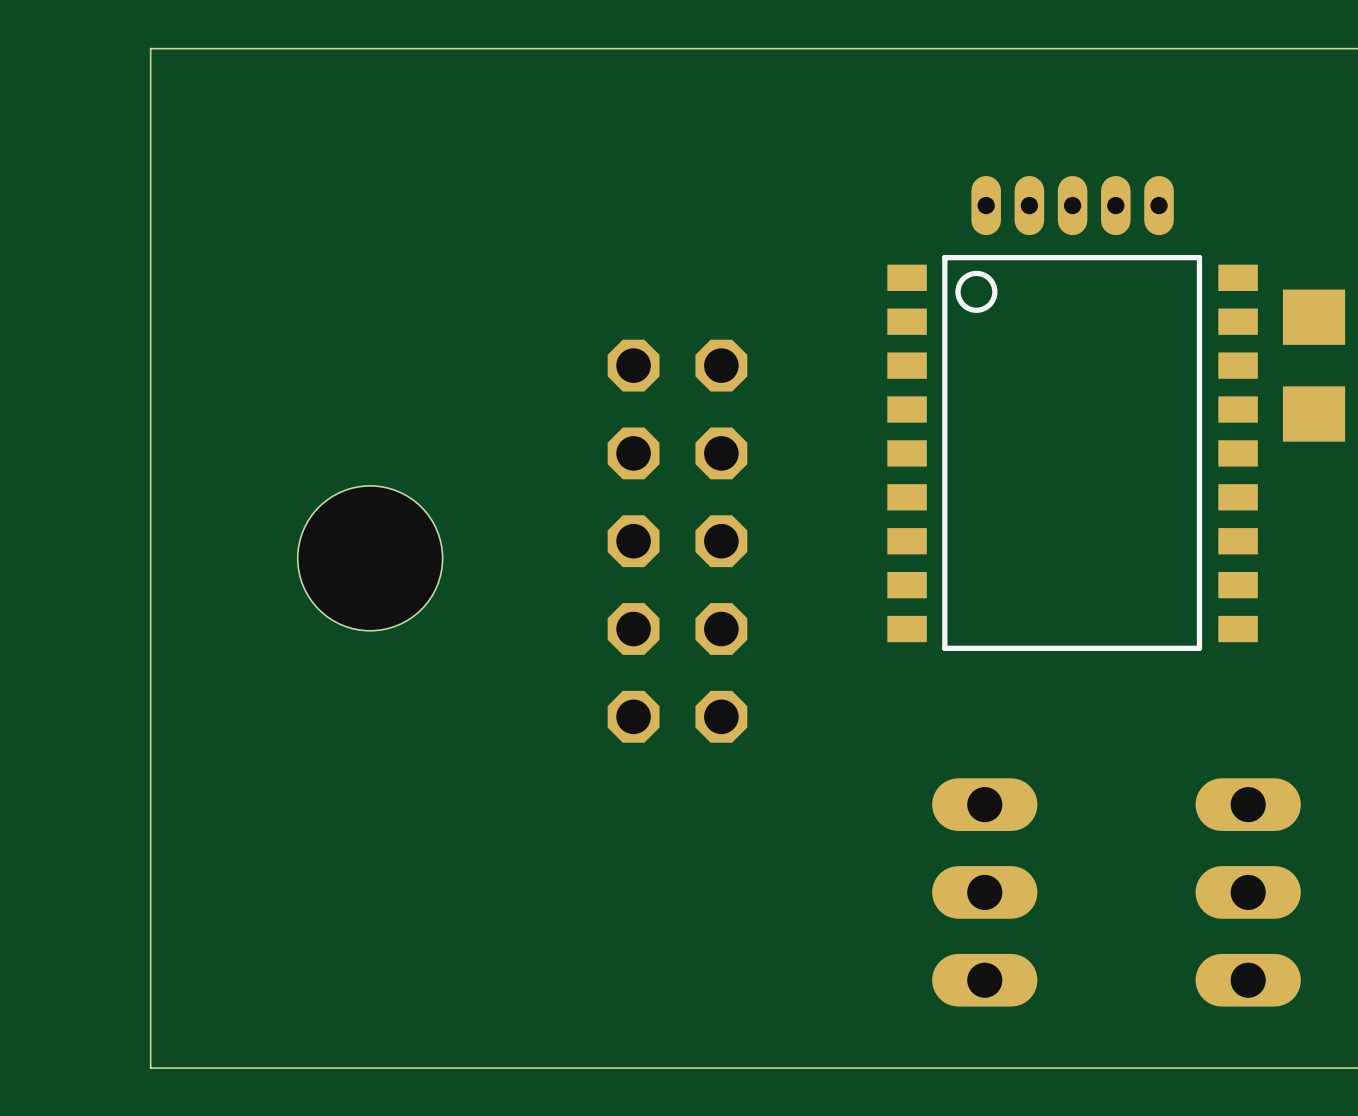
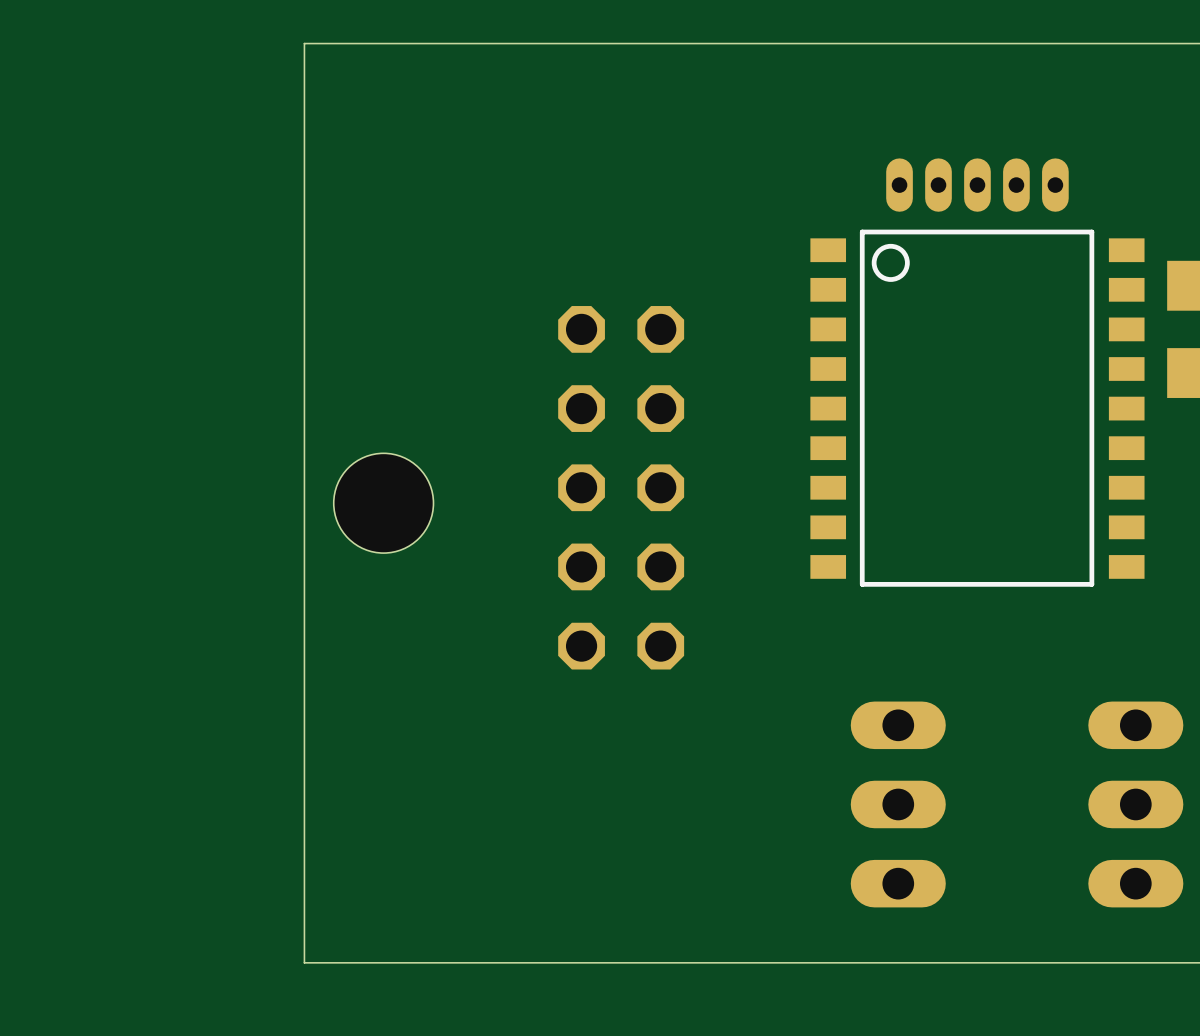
board edge: (326, 48) (150, 48) (150, 1068) (326, 1068) -> (304, 43) (304, 962)
hole: (370, 558) -> none
hole: none -> (383, 503)

